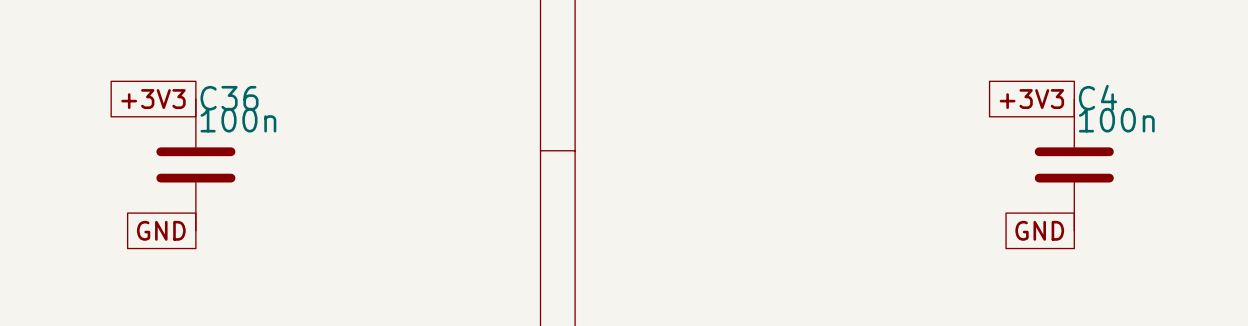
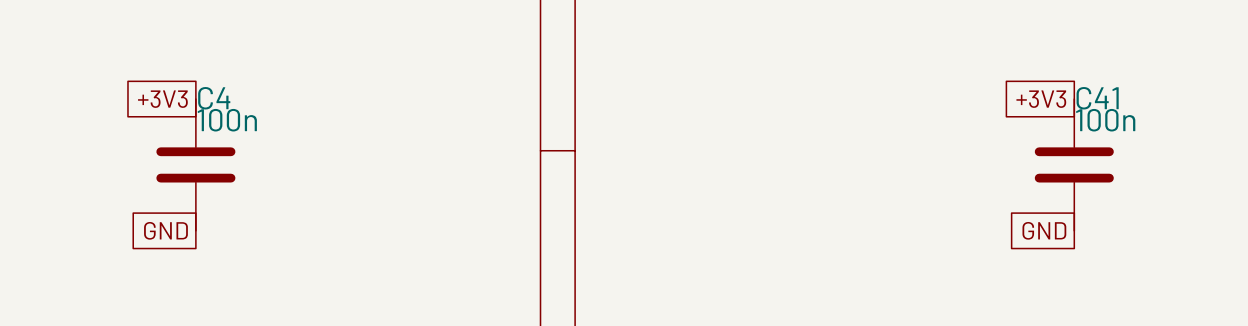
C4 name: C4 (1097, 97) -> C41 (1097, 98)
C36 name: C36 (229, 98) -> C4 (214, 98)

